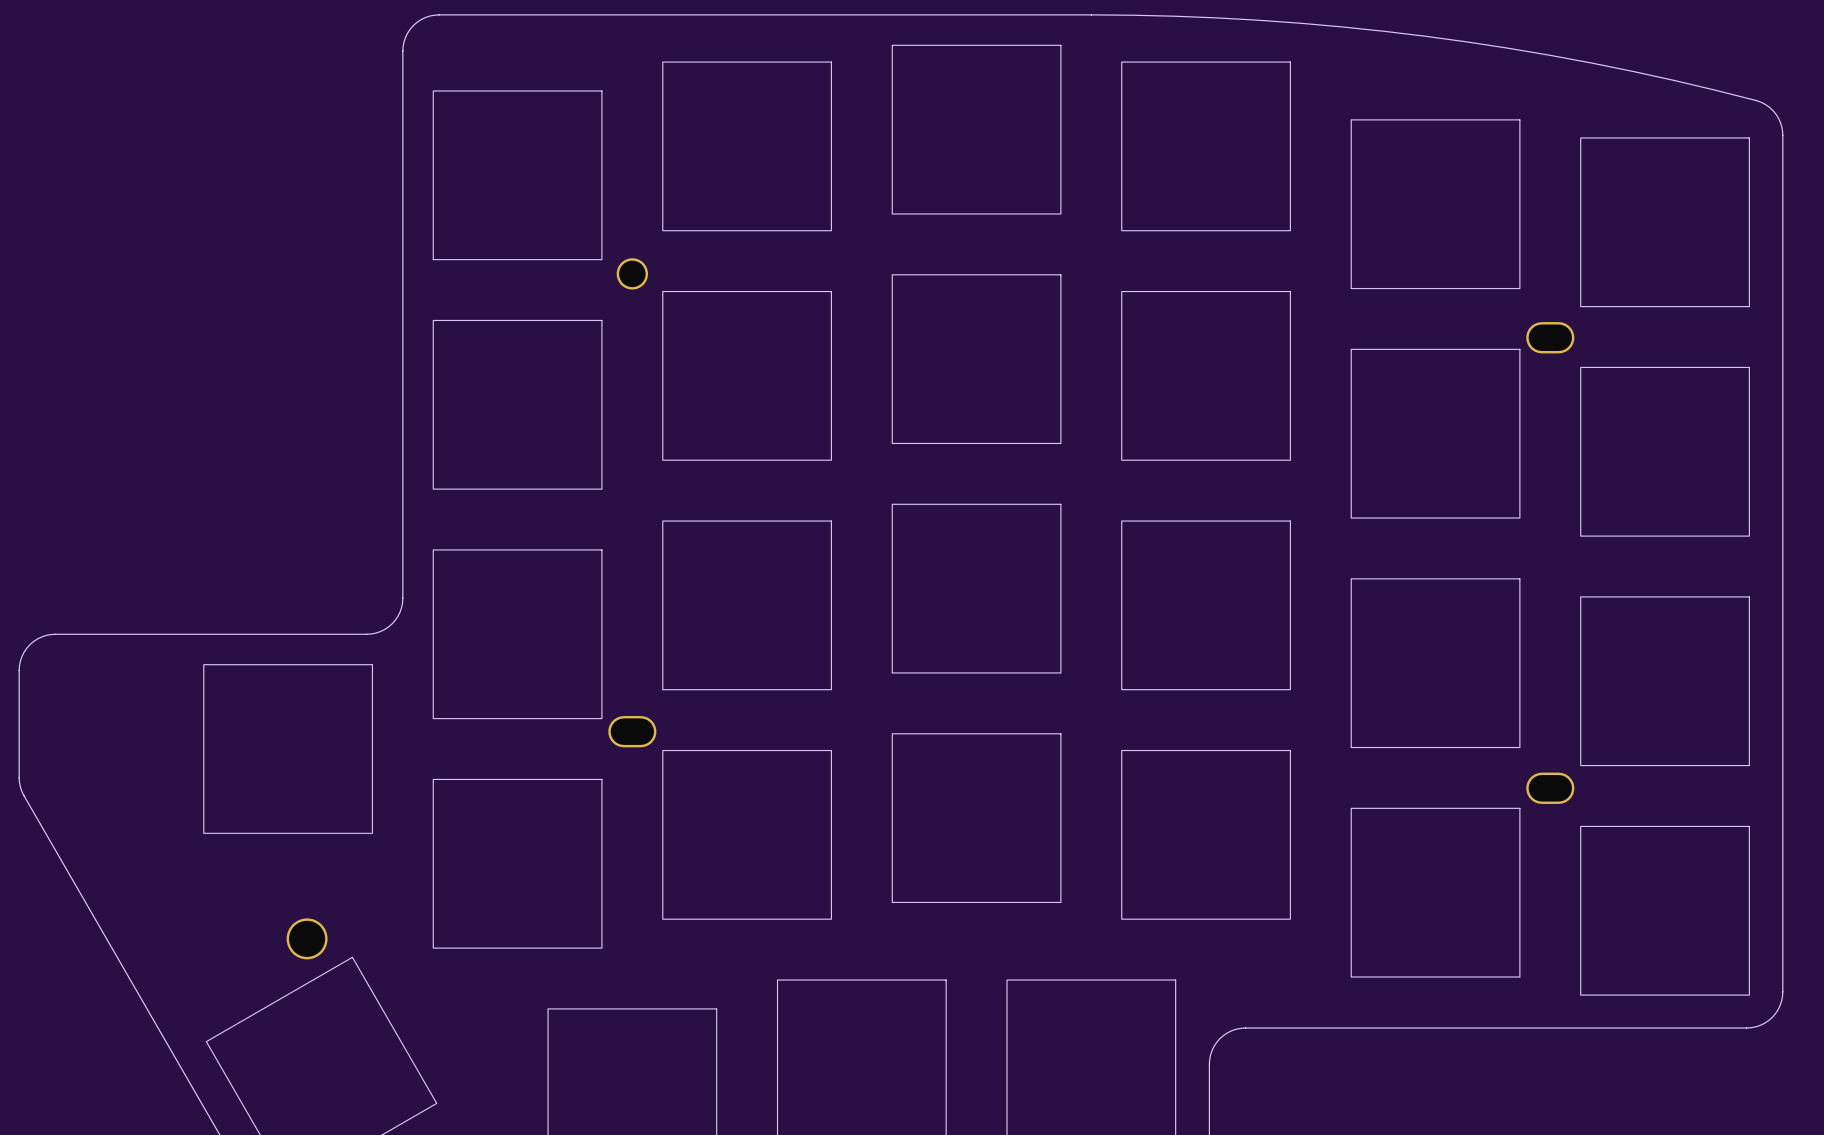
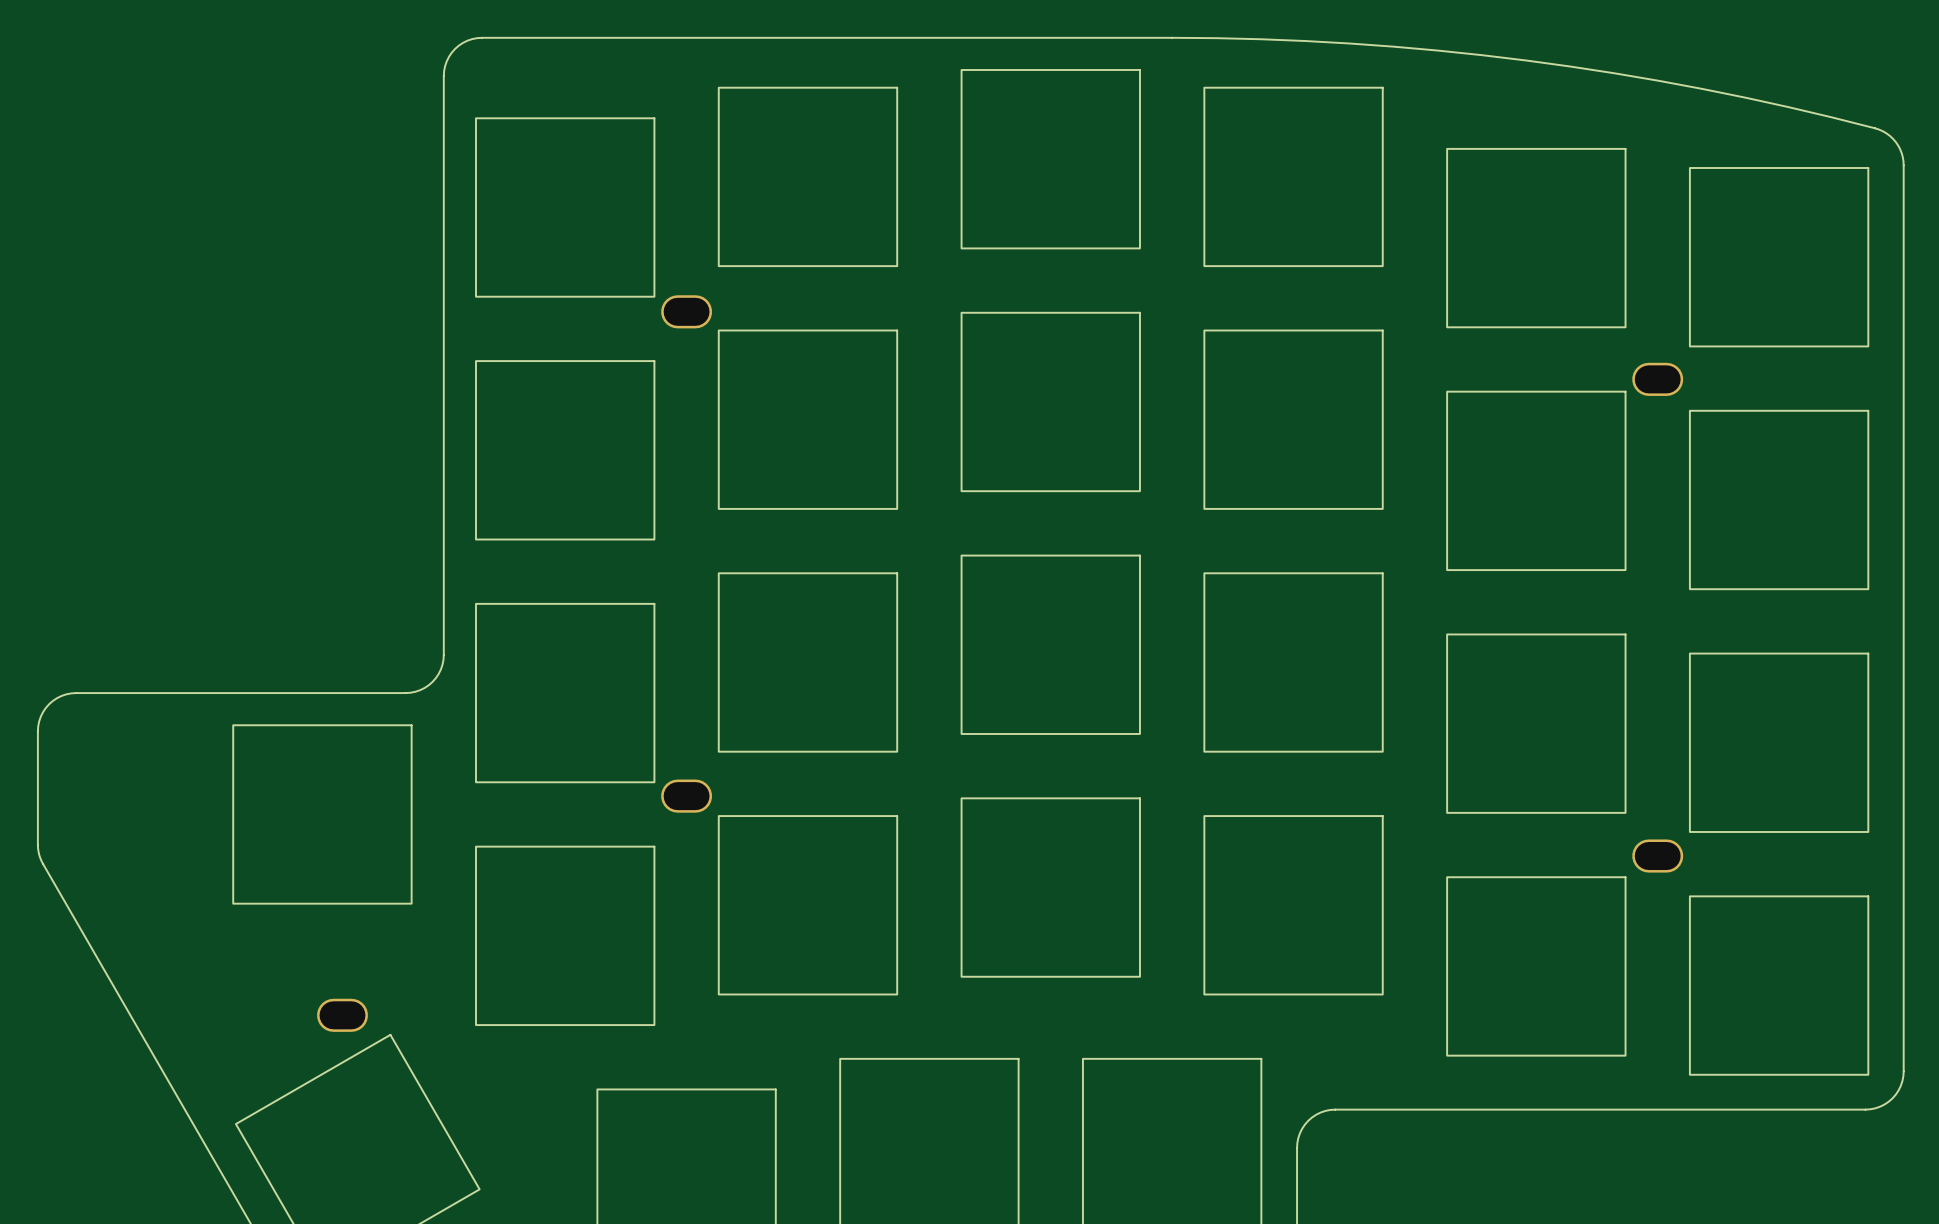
part footprint: [616, 258, 649, 290] -> [661, 295, 713, 329]
part footprint: [286, 918, 328, 960] -> [317, 998, 368, 1032]

